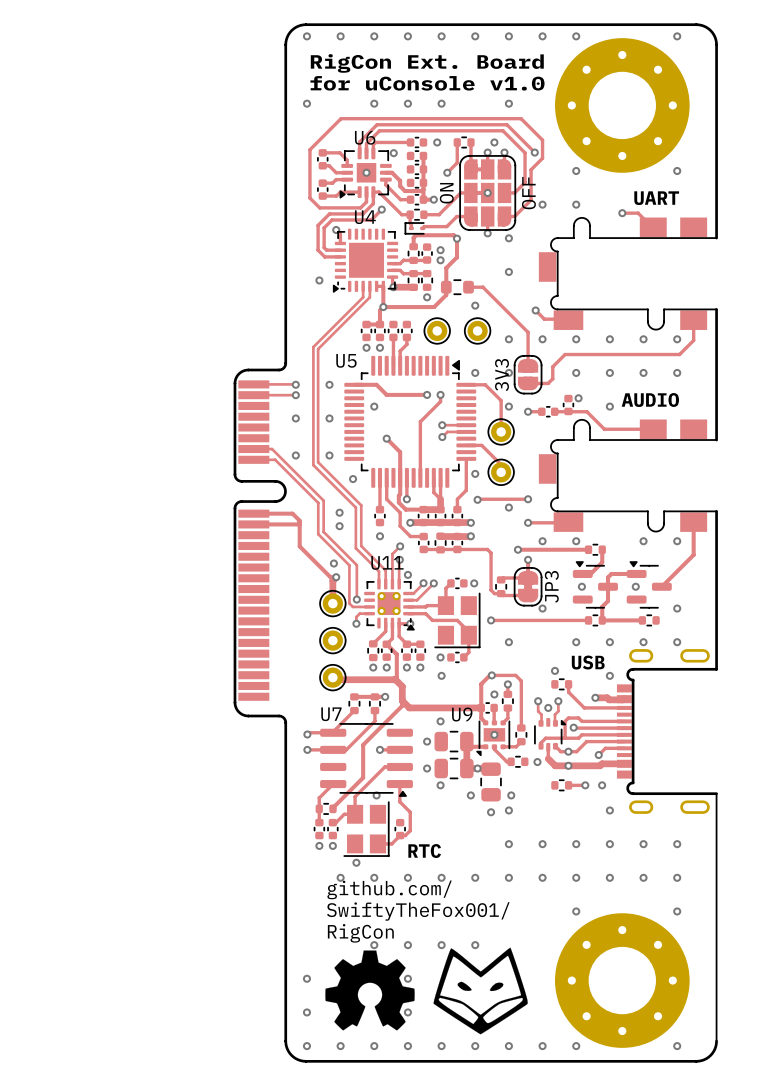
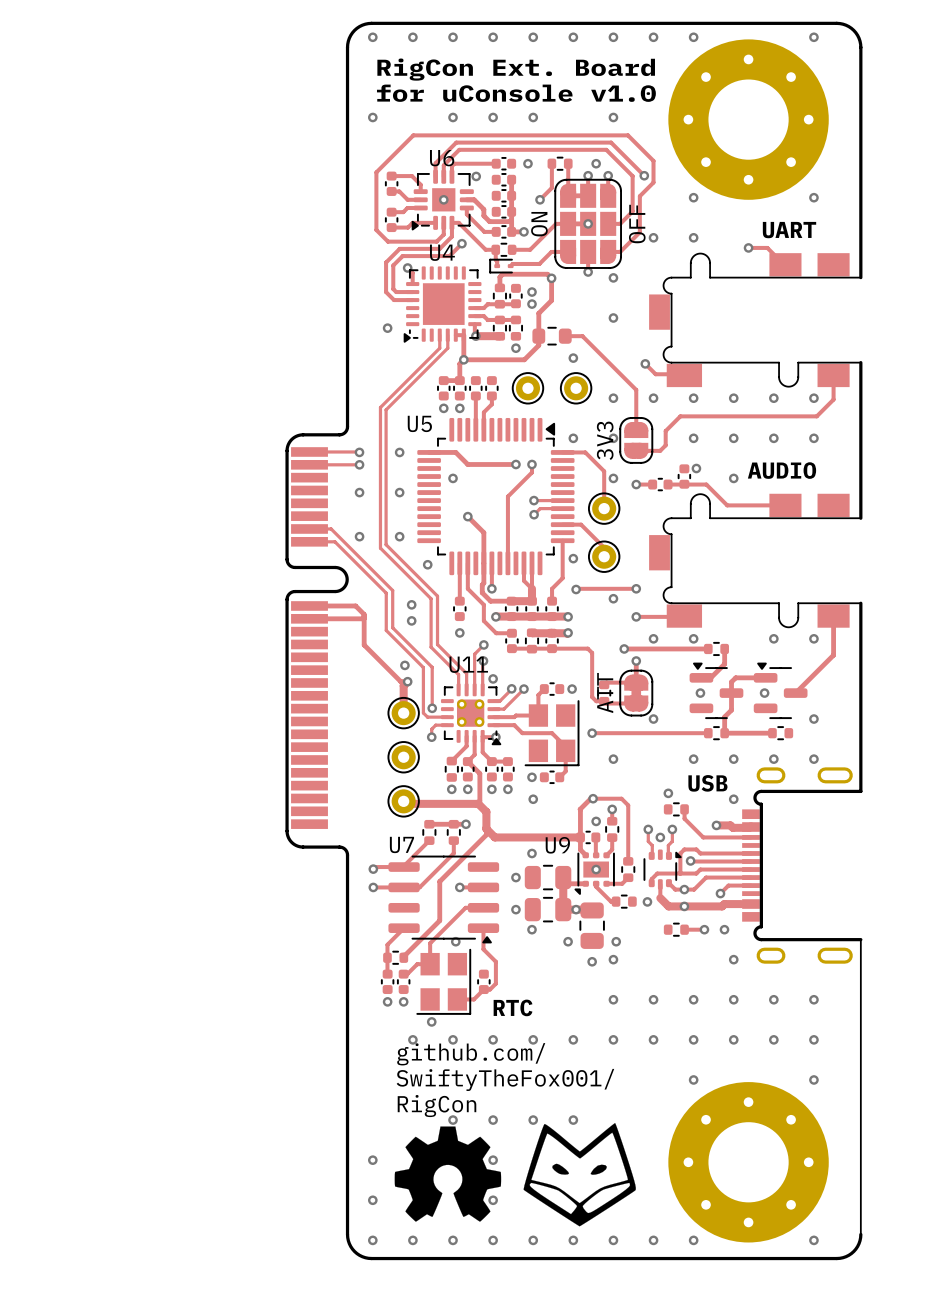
JP3 value: none -> ATT (605, 693)
JP3 name: JP3 (551, 586) -> none

